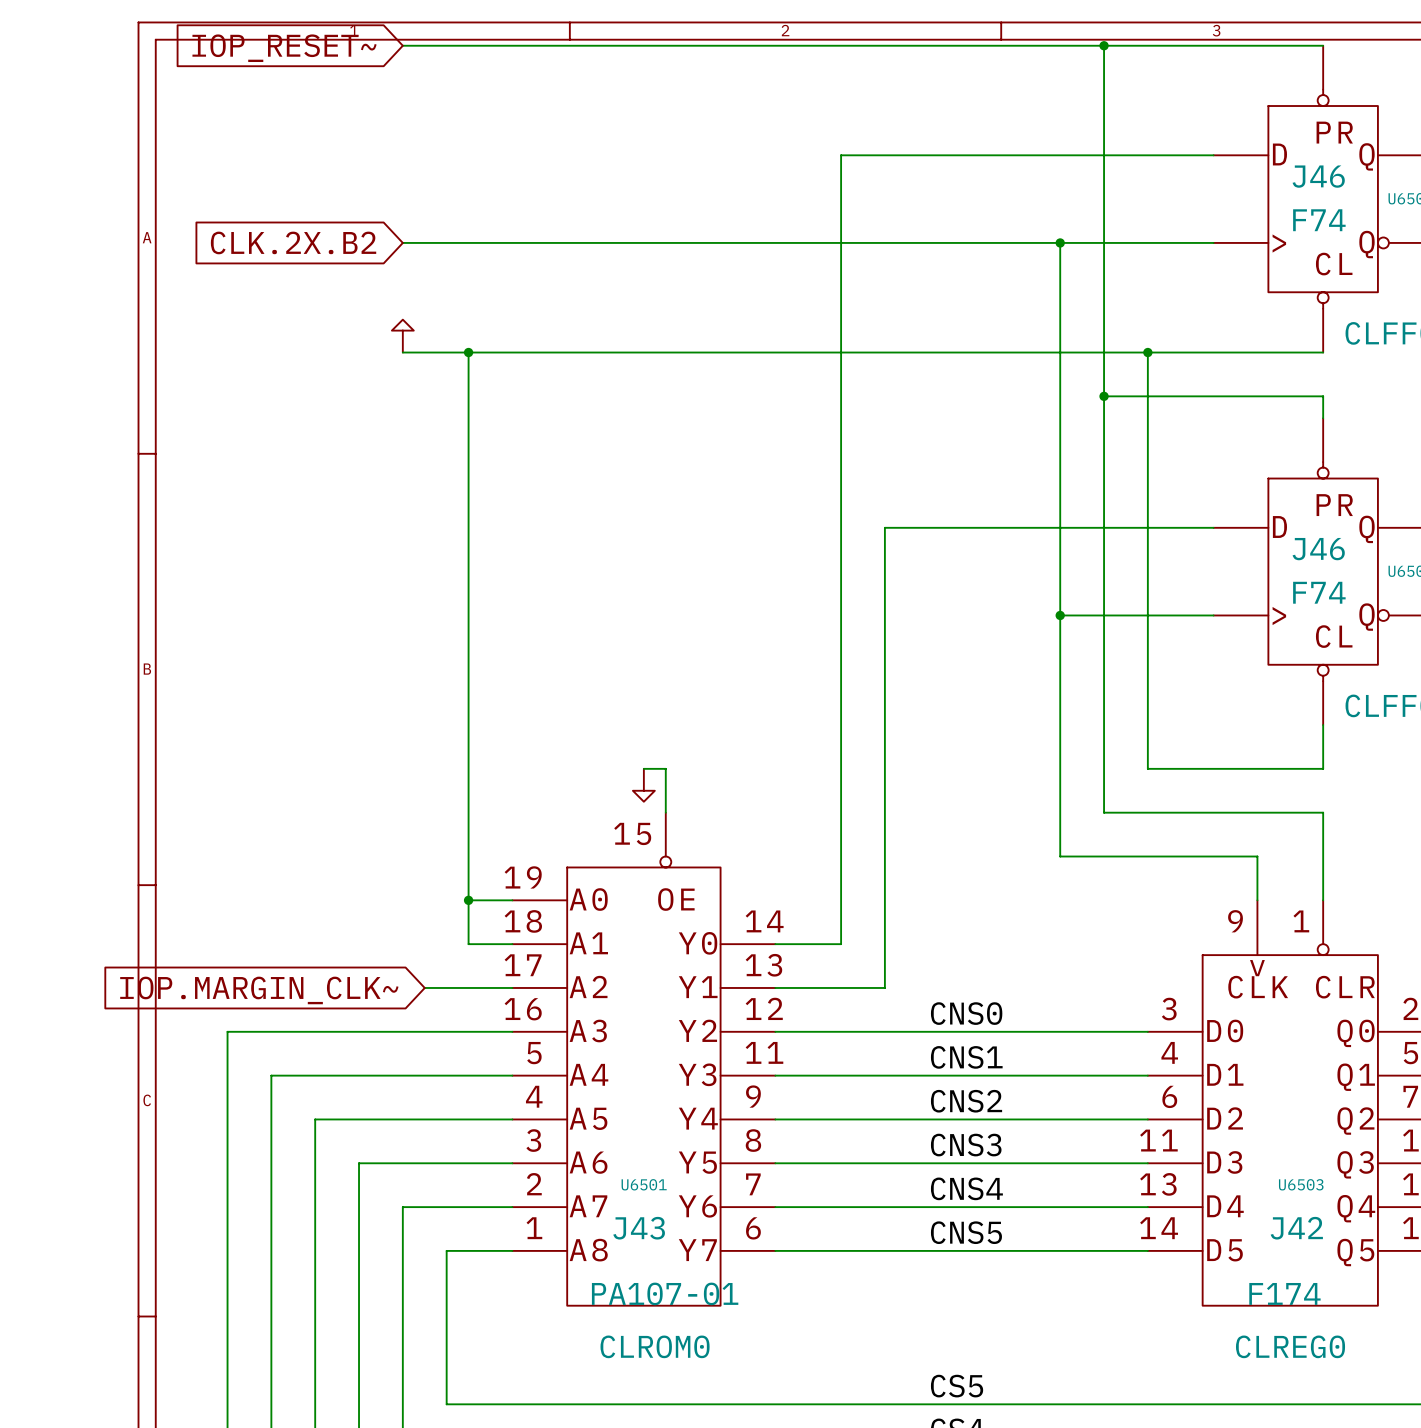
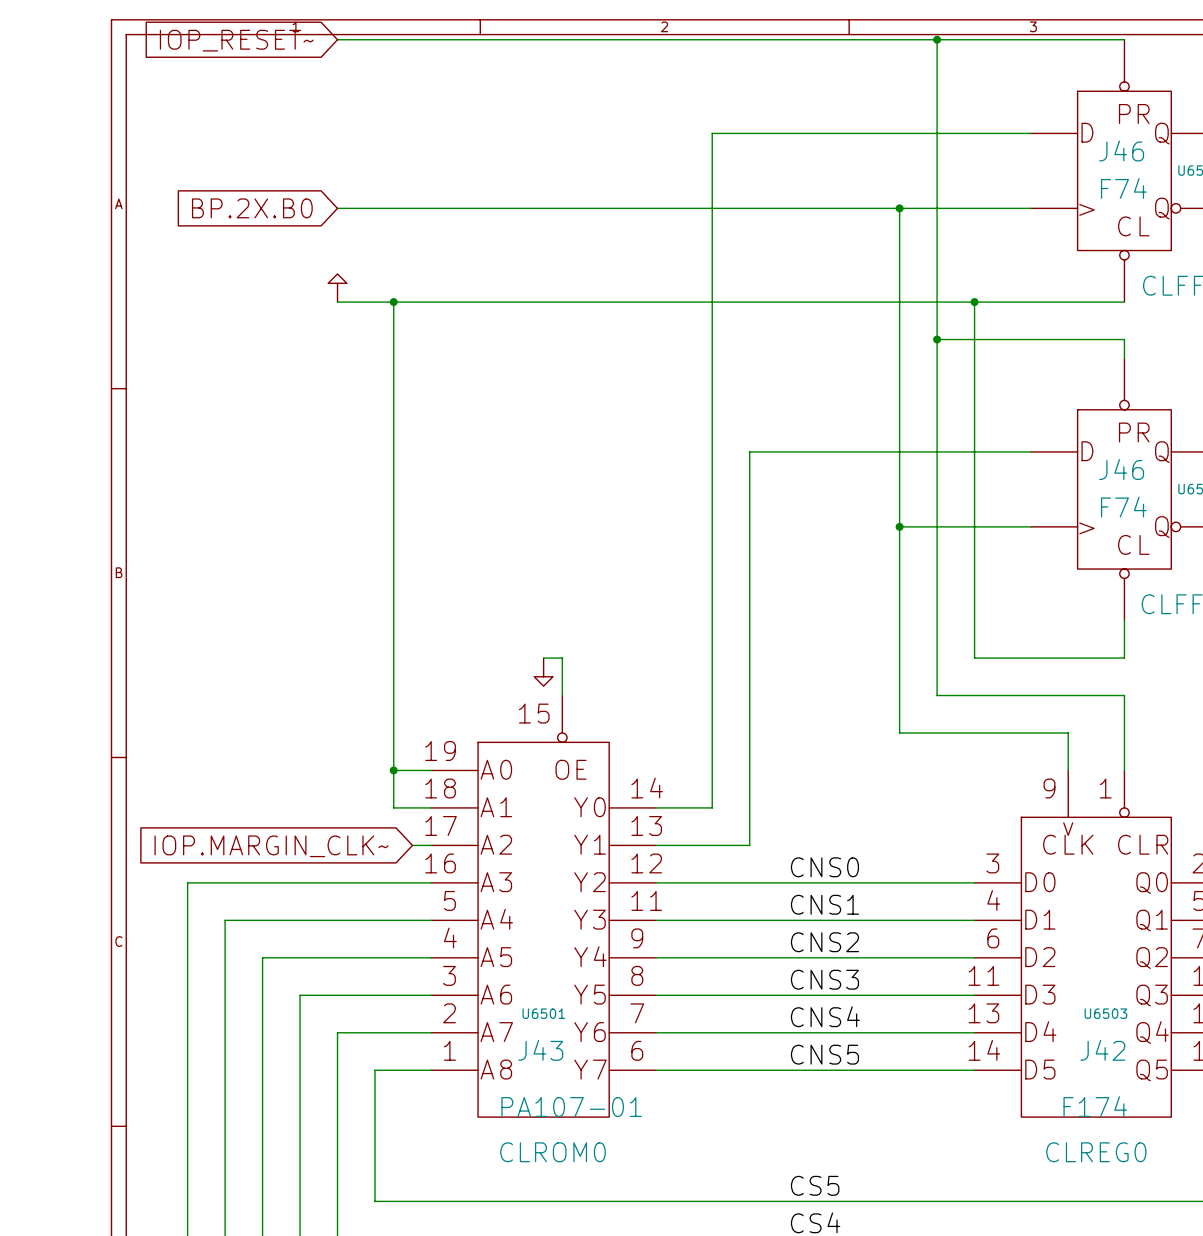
global label: CLK.2X.B2 (293, 242) -> BP.2X.B0 (252, 208)
wire: (424, 987) (490, 987) -> none
global label position: IOP.MARGIN_CLK~ (259, 990) -> IOP.MARGIN_CLK~ (271, 846)

